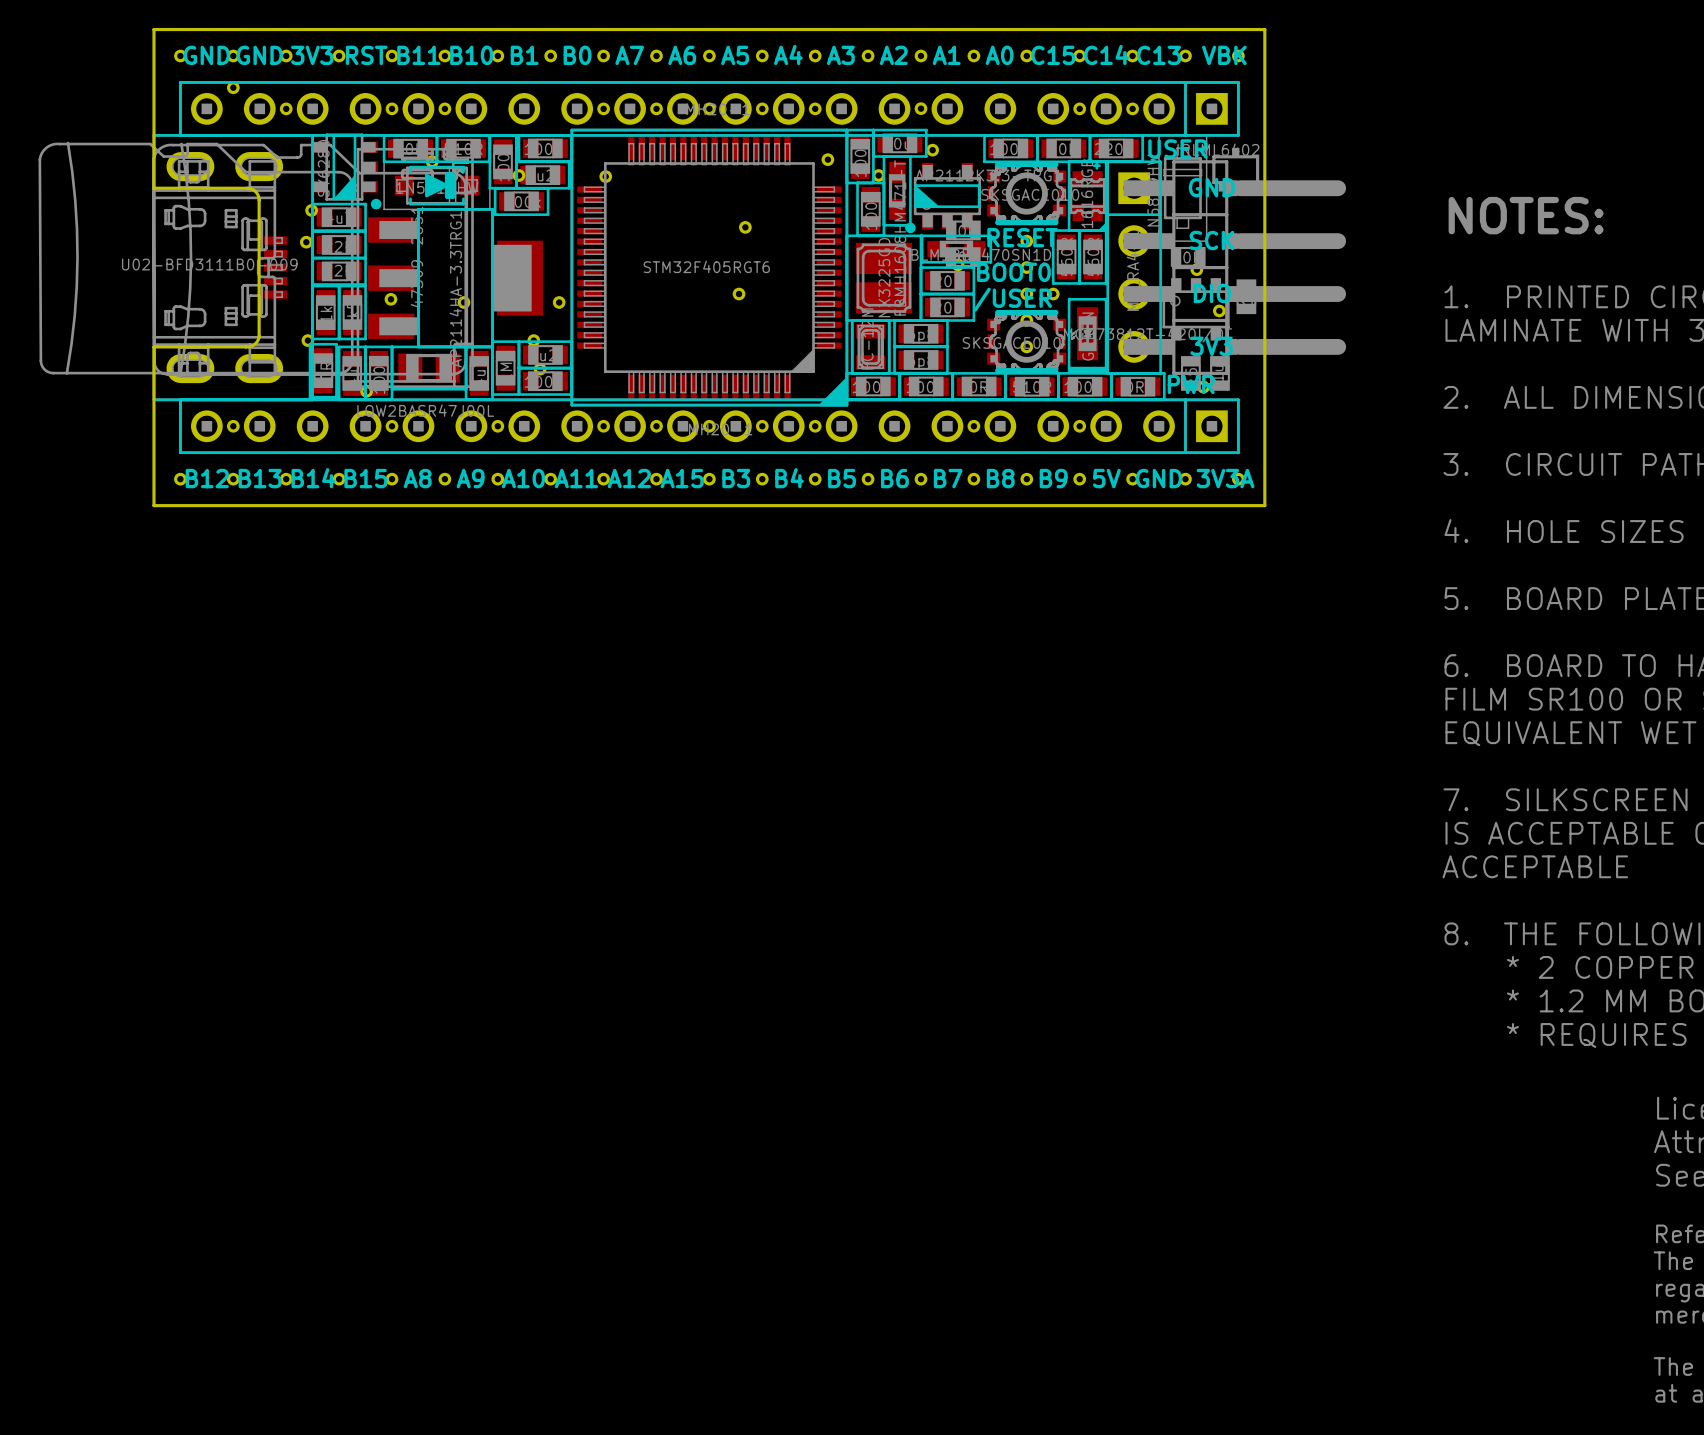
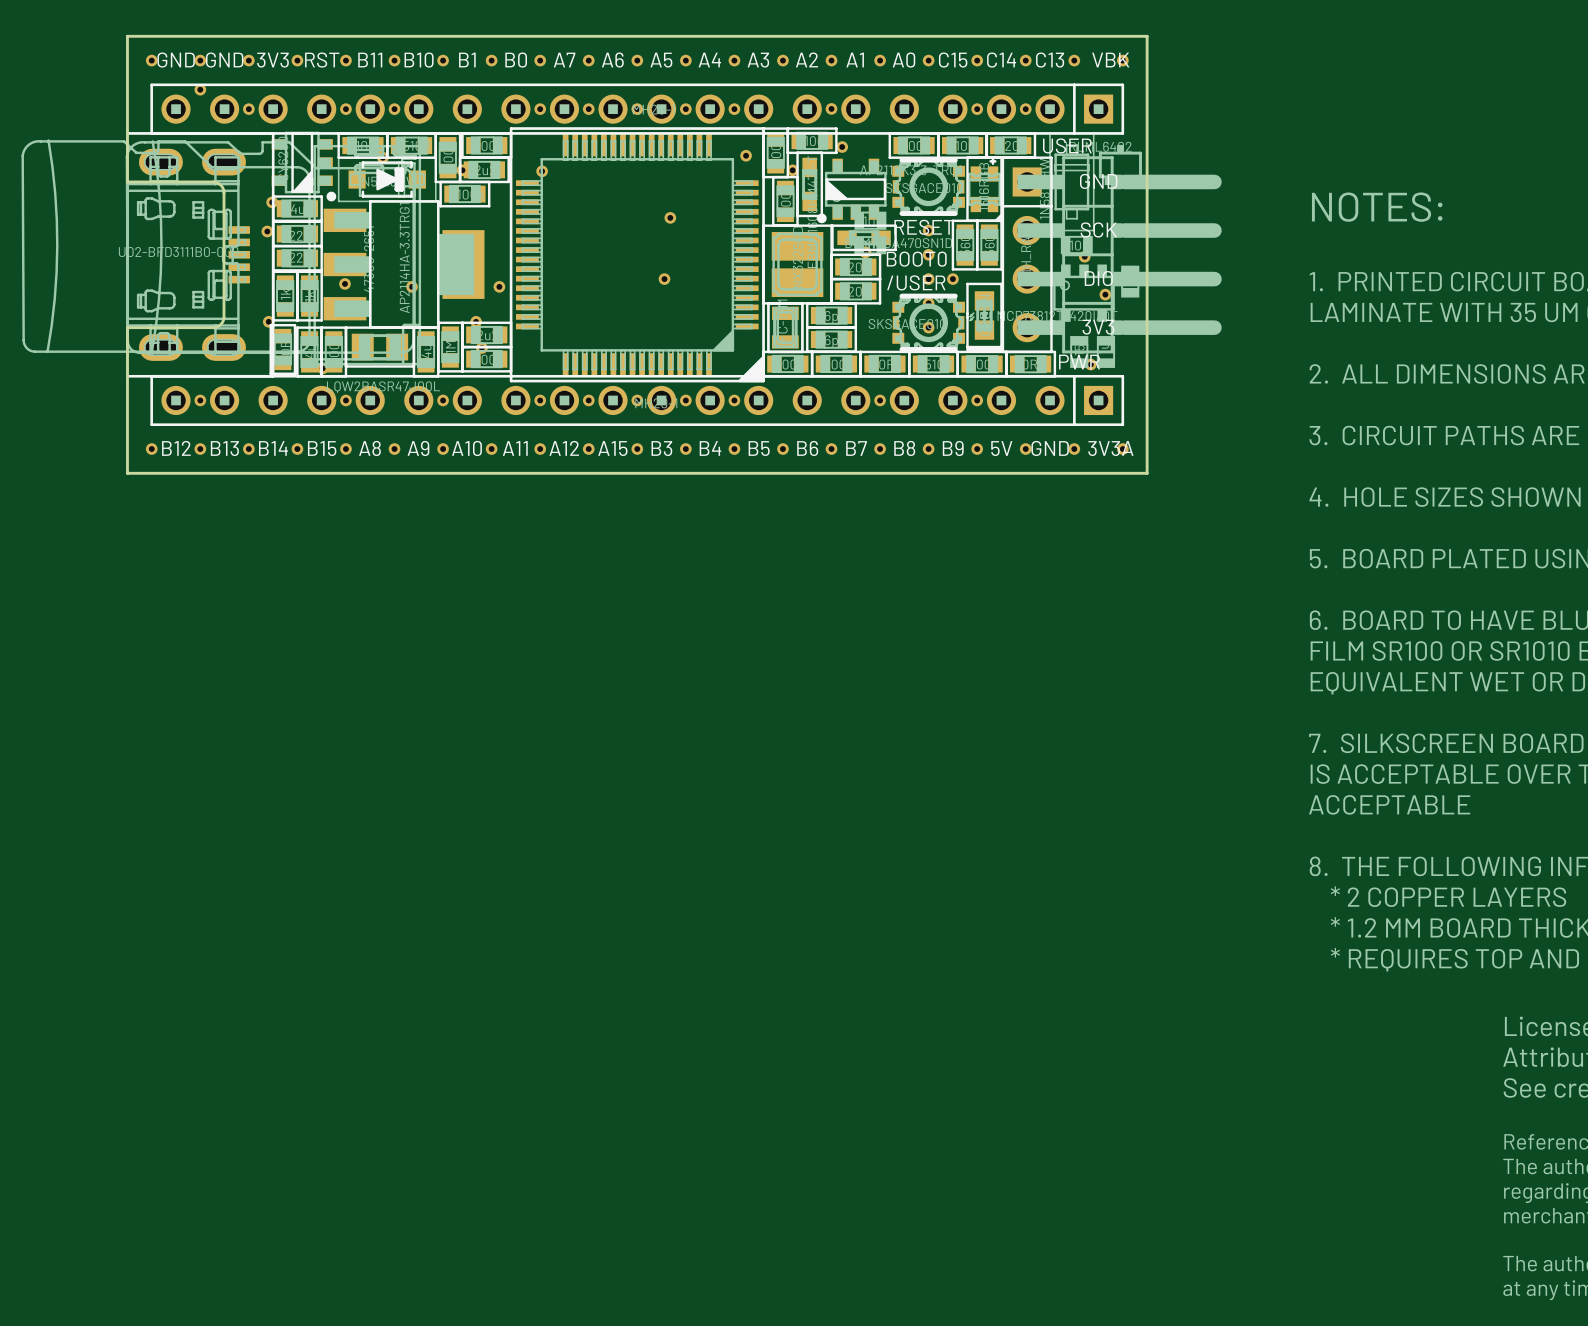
part value: STM32F405RGT6 (706, 266) -> none

